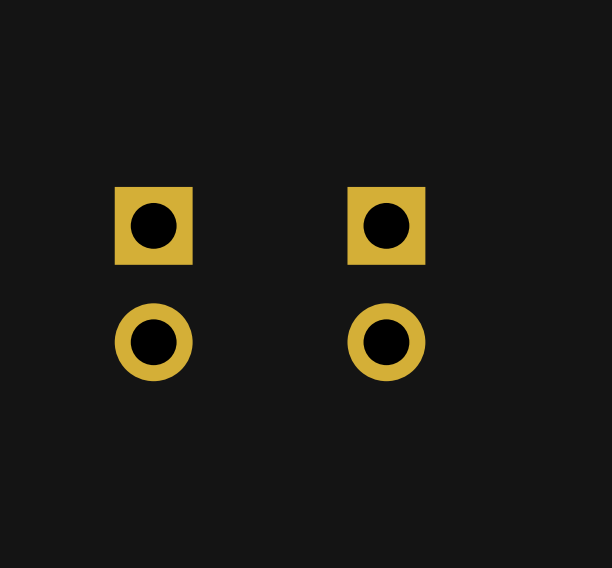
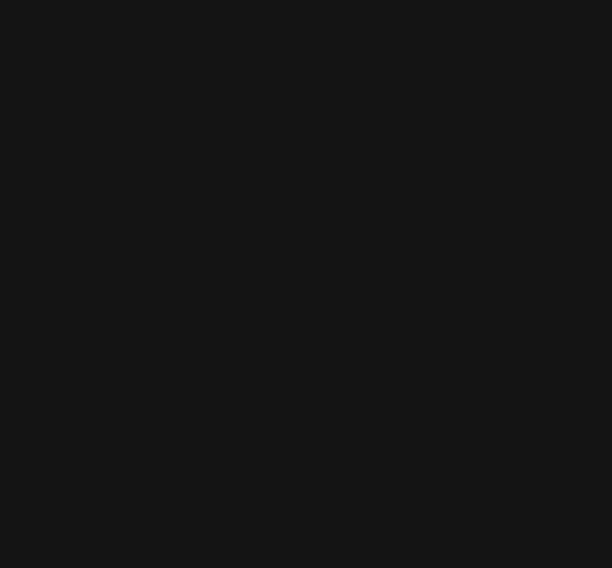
part: (153, 284) -> none
part: (386, 284) -> none

